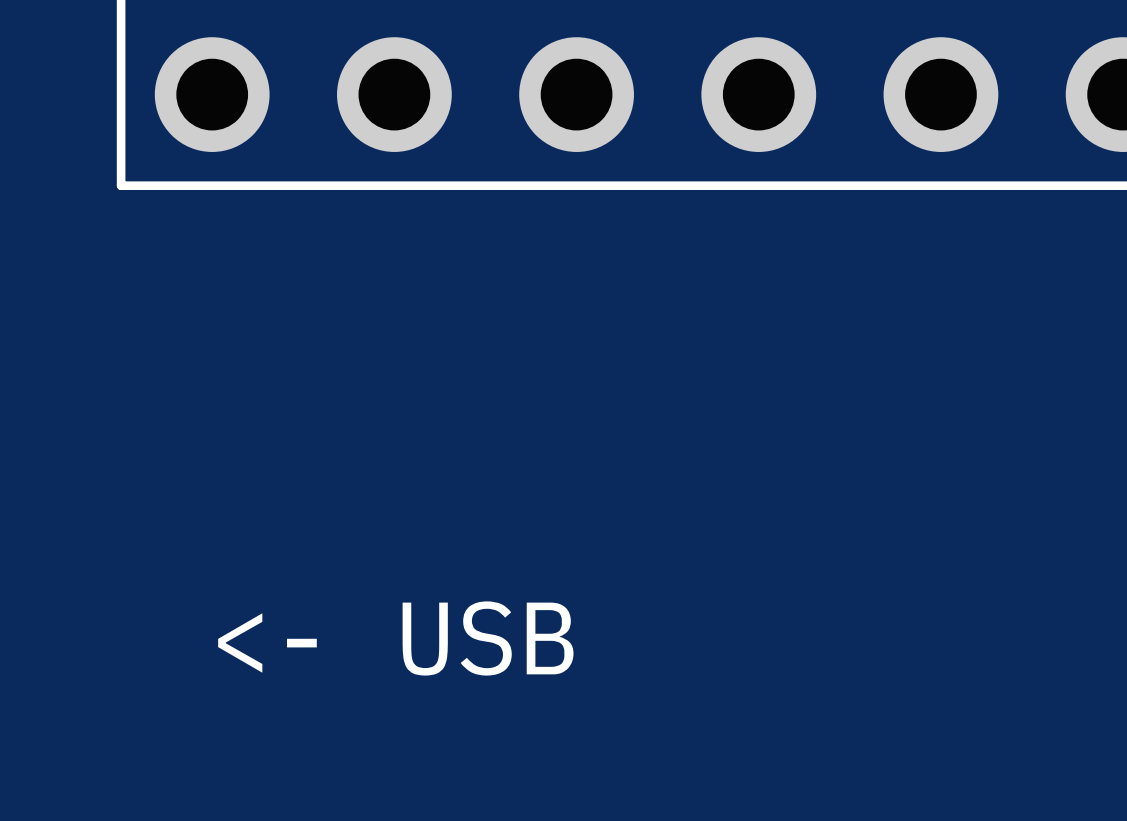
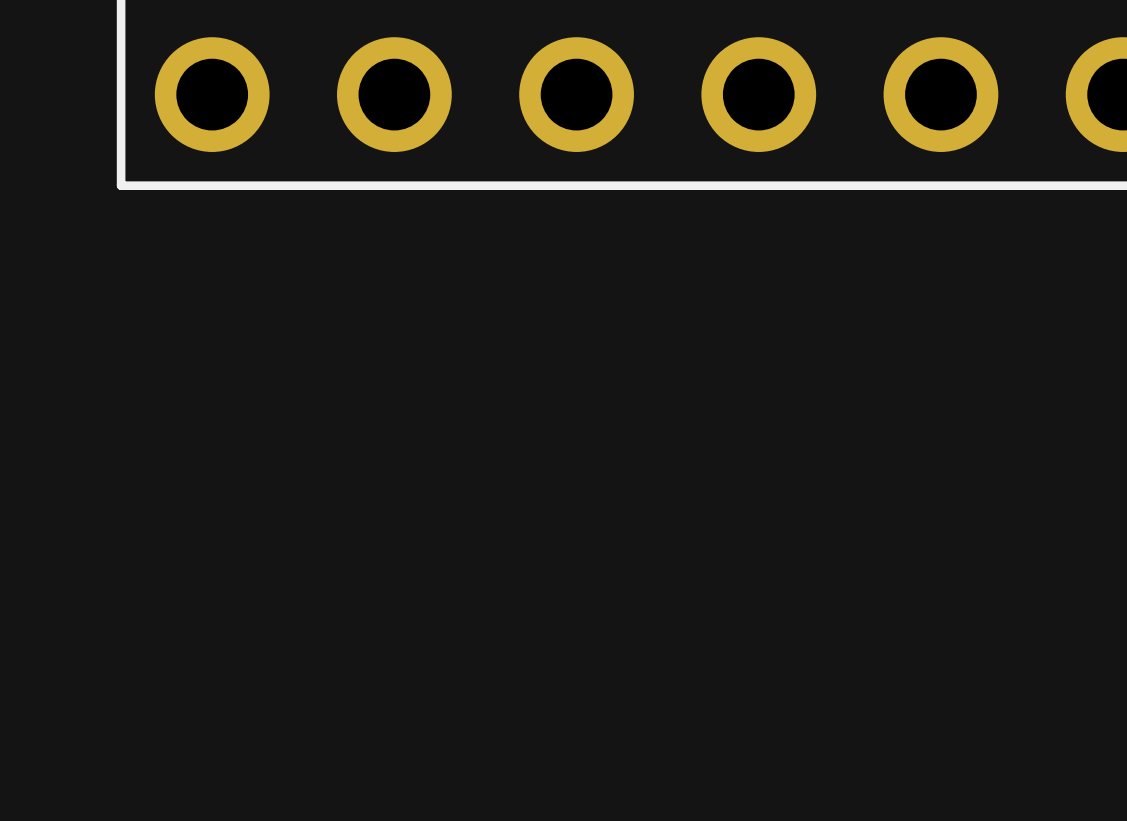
text: <- USB (395, 638) -> none

